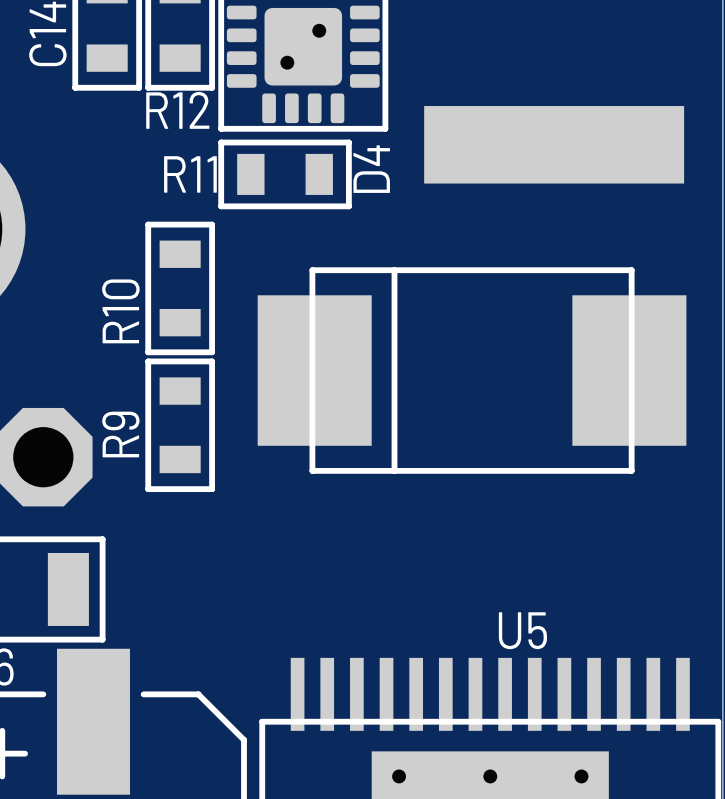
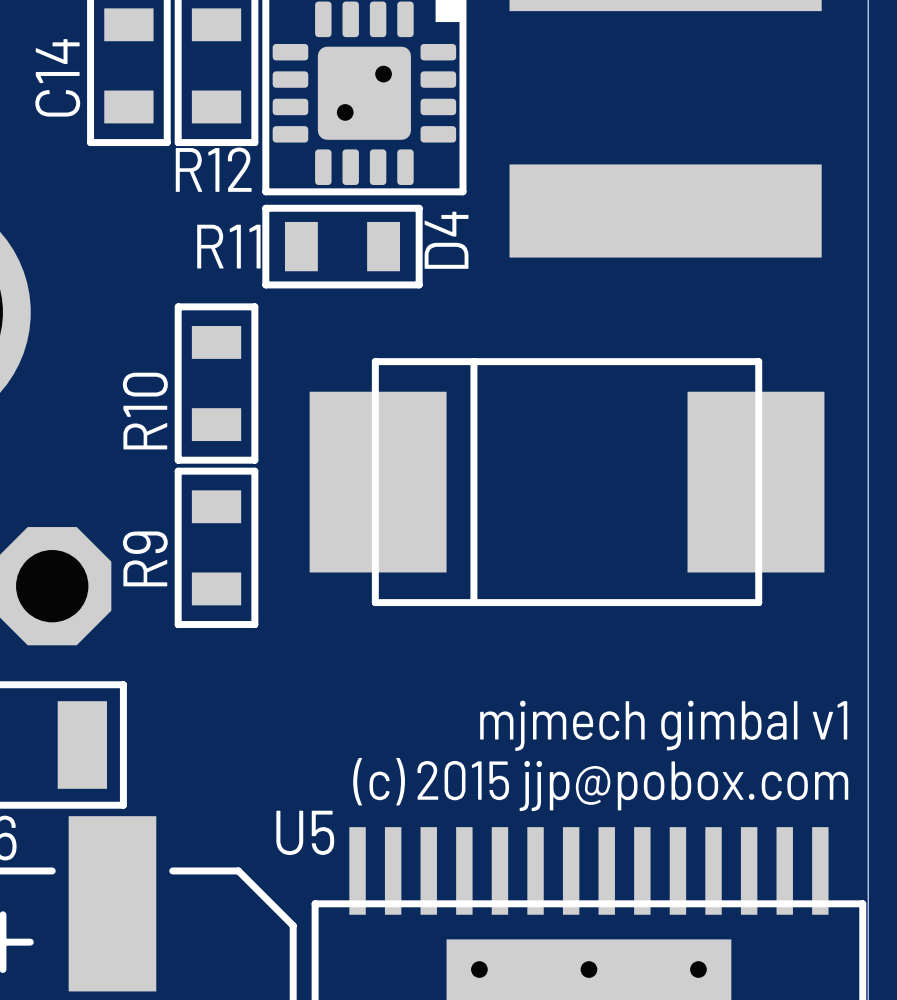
text: none -> mjmech gimbal v1 (663, 725)
text: none -> (c) 2015 jjp@pobox.com (600, 784)
U5 name position: U5 (522, 630) -> U5 (305, 832)

